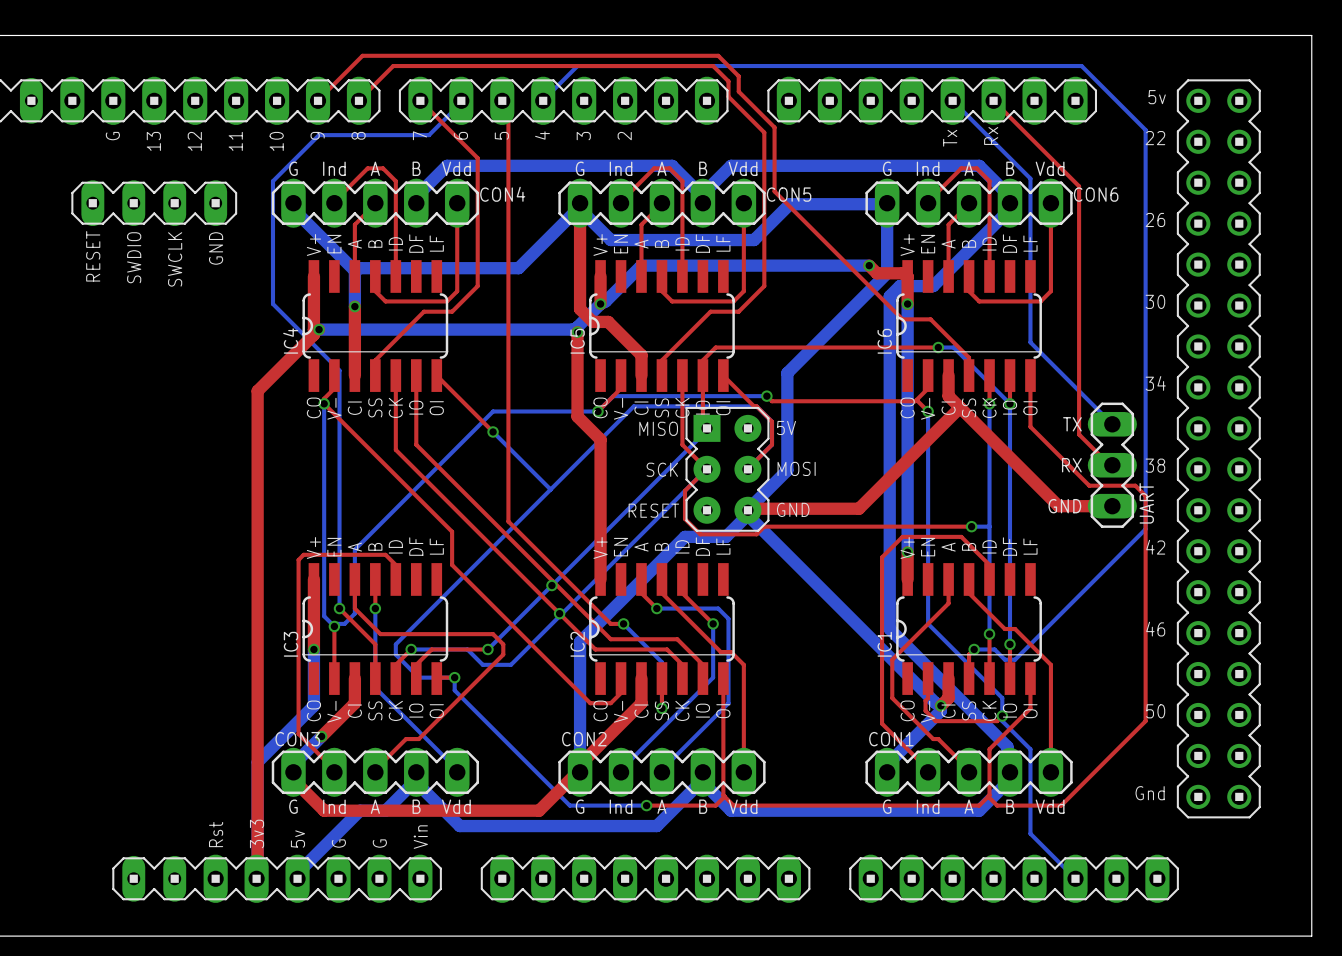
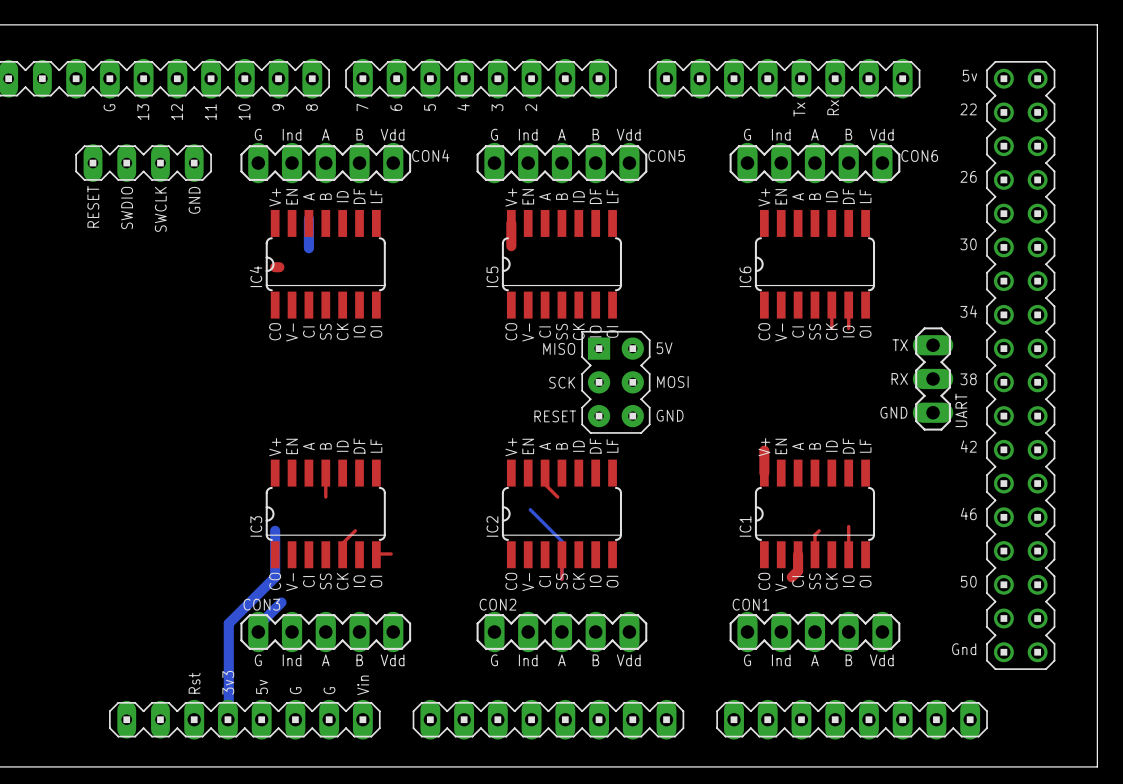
top track: (318, 100) (362, 55) (718, 55) (738, 76) (738, 91) (774, 127) (774, 191) (902, 319) (930, 319) (969, 357) (969, 375) -> none
top track: (358, 100) (393, 66) (713, 66) (728, 81) (728, 96) (764, 132) (764, 286) (738, 311) (710, 311) (661, 360) (661, 375) -> none
top track: (420, 100) (477, 158) (477, 286) (452, 311) (423, 311) (375, 360) (375, 375) -> none
bottom track: (461, 100) (429, 135) (319, 135) (272, 181) (272, 304) (339, 370) (339, 608) -> none
top track: (502, 100) (508, 106) (508, 521) (610, 623) (623, 623) -> none
bottom track: (543, 100) (577, 66) (1081, 66) (1145, 130) (1145, 529) (1015, 659) (1004, 659) (994, 649) (974, 649) -> none
bottom track: (952, 100) (1030, 178) (1030, 342) (1112, 424) -> none
top track: (993, 100) (1079, 186) (1079, 434) (1109, 465) (1112, 465) -> none
bottom track: (293, 203) (293, 209) (354, 270) (360, 268) (518, 268) (574, 211) (580, 203) (580, 209) (610, 240) (754, 240) (789, 204) (887, 204) -> none
top track: (334, 203) (367, 168) (383, 168) (395, 181) (395, 276) -> none
top track: (375, 203) (354, 224) (354, 276) -> none
bottom track: (416, 203) (416, 196) (447, 165) (672, 165) (702, 196) (702, 203) (705, 191) (731, 165) (979, 165) (1009, 196) (1007, 211) (933, 286) (899, 286) (889, 296) (889, 629) (1007, 746) (1007, 767) (1009, 772) (1009, 780) (979, 810) (731, 810) (705, 785) (702, 772) (702, 780) (656, 826) (459, 826) (418, 785) (416, 772) (416, 780) (385, 810) (360, 810) (298, 872) (297, 878) -> none
top track: (457, 203) (457, 291) (447, 301) (385, 301) (375, 291) (375, 276) -> none
top track: (580, 203) (580, 309) (592, 321) (608, 321) (641, 355) (641, 375) -> none
top track: (621, 203) (654, 168) (669, 168) (682, 181) (682, 276) -> none
top track: (661, 203) (641, 224) (641, 276) -> none
top track: (743, 203) (743, 291) (733, 301) (672, 301) (661, 291) (661, 276) -> none
bottom track: (887, 203) (887, 273) (787, 373) (787, 470) (747, 510) -> none
top track: (928, 203) (961, 168) (976, 168) (989, 181) (989, 276) -> none
top track: (969, 203) (948, 224) (948, 276) -> none
top track: (1050, 203) (1050, 291) (1040, 301) (979, 301) (969, 291) (969, 276) -> none
top track: (869, 265) (876, 273) (902, 273) (907, 276) (907, 304) -> none
bottom track: (869, 265) (641, 265) (577, 327) (577, 332) (572, 329) (319, 329) -> none
via: (869, 265) -> none
top track: (313, 276) (313, 334) (257, 391) (256, 878) -> none
via: (600, 304) -> none
bottom track: (907, 304) (907, 552) -> none
via: (907, 304) -> none
top track: (354, 306) (354, 375) -> none
via: (354, 306) -> none
via: (319, 329) -> none
top track: (577, 332) (577, 416) (600, 439) (600, 579) -> none
via: (577, 332) -> none
top track: (938, 347) (715, 347) (702, 360) (702, 424) (707, 428) -> none
bottom track: (938, 347) (953, 347) (1009, 403) (1009, 644) -> none
via: (938, 347) -> none
top track: (334, 375) (334, 388) (324, 398) (324, 403) (452, 531) (452, 565) (590, 703) (610, 703) (621, 692) (621, 678) -> none
top track: (395, 375) (395, 449) (595, 649) (667, 649) (682, 664) (682, 678) -> none
top track: (416, 375) (416, 444) (610, 639) (677, 639) (702, 664) (702, 678) -> none
top track: (436, 375) (493, 431) -> none
top track: (621, 375) (621, 388) (597, 411) -> none
top track: (682, 375) (682, 444) (707, 469) (684, 490) (684, 518) (700, 534) (756, 534) (764, 526) (971, 526) -> none
top track: (723, 375) (772, 421) (772, 444) (747, 469) -> none
top track: (928, 375) (928, 388) (915, 401) (772, 401) (766, 396) -> none
top track: (948, 375) (948, 396) (1058, 506) (1112, 506) -> none
top track: (1030, 375) (1030, 426) (1089, 485) (1135, 485) (1145, 495) (1145, 721) (1061, 805) (997, 805) (988, 796) -> none
bottom track: (766, 396) (613, 396) (597, 411) (493, 411) (354, 549) (354, 613) (344, 623) (334, 623) (334, 626) (324, 616) (324, 403) -> none
via: (766, 396) -> none
top track: (916, 399) (928, 411) -> none
via: (324, 403) -> none
bottom track: (989, 403) (989, 634) -> none
via: (989, 403) -> none
via: (1009, 403) -> none
top track: (960, 407) (859, 508) (748, 508) (747, 510) -> none
via: (597, 411) -> none
bottom track: (928, 411) (928, 623) (1002, 698) (1002, 721) (1030, 749) (1030, 833) (1075, 878) -> none
via: (928, 411) -> none
bottom track: (707, 428) (487, 649) -> none
bottom track: (493, 431) (550, 489) -> none
via: (493, 431) -> none
bottom track: (707, 469) (510, 664) (482, 664) (467, 649) (411, 649) -> none
bottom track: (747, 469) (772, 444) (772, 421) (756, 406) (633, 406) (395, 644) (395, 654) (418, 677) (454, 677) (454, 690) (569, 805) (646, 805) -> none
bottom track: (747, 510) (748, 516) (935, 703) (940, 705) (940, 710) (887, 764) (887, 772) -> none
bottom track: (747, 510) (743, 518) (725, 536) (684, 536) (580, 641) (580, 772) -> none
bottom track: (971, 526) (989, 526) -> none
via: (971, 526) -> none
via: (907, 552) -> none
top track: (313, 579) (313, 649) -> none
top track: (354, 579) (354, 608) (380, 634) (493, 634) (503, 644) (503, 654) (418, 739) (406, 739) (375, 769) (375, 772) -> none
top track: (395, 579) (395, 565) (385, 554) (303, 554) (298, 559) (298, 733) (334, 769) (334, 772) -> none
top track: (661, 579) (661, 593) (720, 652) (731, 652) (743, 664) (743, 772) -> none
top track: (682, 579) (682, 593) (713, 623) -> none
top track: (948, 579) (948, 603) (892, 659) (892, 698) (933, 739) (938, 739) (969, 769) (969, 772) -> none
top track: (969, 579) (969, 593) (1004, 629) (1015, 629) (1050, 664) (1050, 772) -> none
top track: (989, 579) (989, 565) (961, 536) (902, 536) (882, 557) (882, 723) (928, 769) (928, 772) -> none
via: (551, 585) -> none
top track: (339, 608) (375, 644) (375, 678) -> none
via: (339, 608) -> none
bottom track: (375, 608) (375, 687) (457, 769) (457, 772) -> none
via: (375, 608) -> none
bottom track: (656, 608) (718, 608) (728, 618) (728, 703) (661, 769) (661, 772) -> none
via: (656, 608) -> none
via: (559, 613) -> none
via: (623, 623) -> none
bottom track: (713, 623) (713, 677) (621, 769) (621, 772) -> none
via: (713, 623) -> none
top track: (334, 626) (334, 678) -> none
via: (334, 626) -> none
top track: (989, 634) (989, 678) -> none
via: (989, 634) -> none
via: (1009, 644) -> none
via: (313, 649) -> none
via: (411, 649) -> none
top track: (487, 649) (431, 649) (416, 664) (416, 678) -> none
via: (487, 649) -> none
via: (974, 649) -> none
via: (454, 677) -> none
top track: (354, 678) (354, 703) (321, 736) -> none
top track: (641, 678) (641, 703) (580, 764) (580, 772) (574, 774) (539, 810) (324, 810) (293, 780) (293, 772) -> none
top track: (723, 678) (723, 795) (733, 805) (979, 805) (989, 795) (989, 749) (1030, 708) (1030, 678) -> none
top track: (928, 678) (928, 698) (925, 700) (925, 710) (935, 721) (997, 721) (1002, 716) -> none
via: (940, 705) -> none
via: (661, 708) -> none
via: (1002, 716) -> none
via: (321, 736) -> none
top track: (724, 796) (715, 805) (646, 805) -> none
via: (646, 805) -> none

